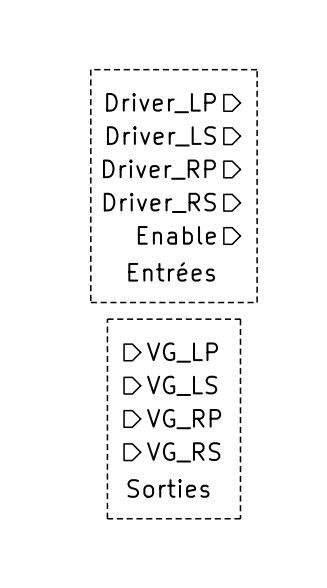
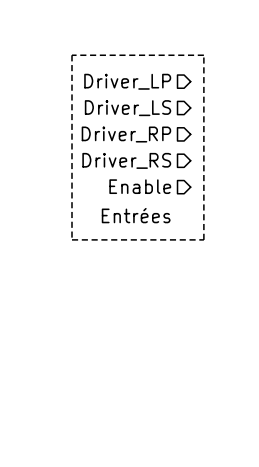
line: (107, 319) (240, 319) (240, 518) (107, 518) (107, 319) -> none
hierarchical label: VG_LP (182, 352) -> none
hierarchical label: VG_LS (182, 385) -> none
hierarchical label: VG_RP (184, 419) -> none
hierarchical label: VG_RS (183, 452) -> none
text: Sorties (168, 488) -> none

